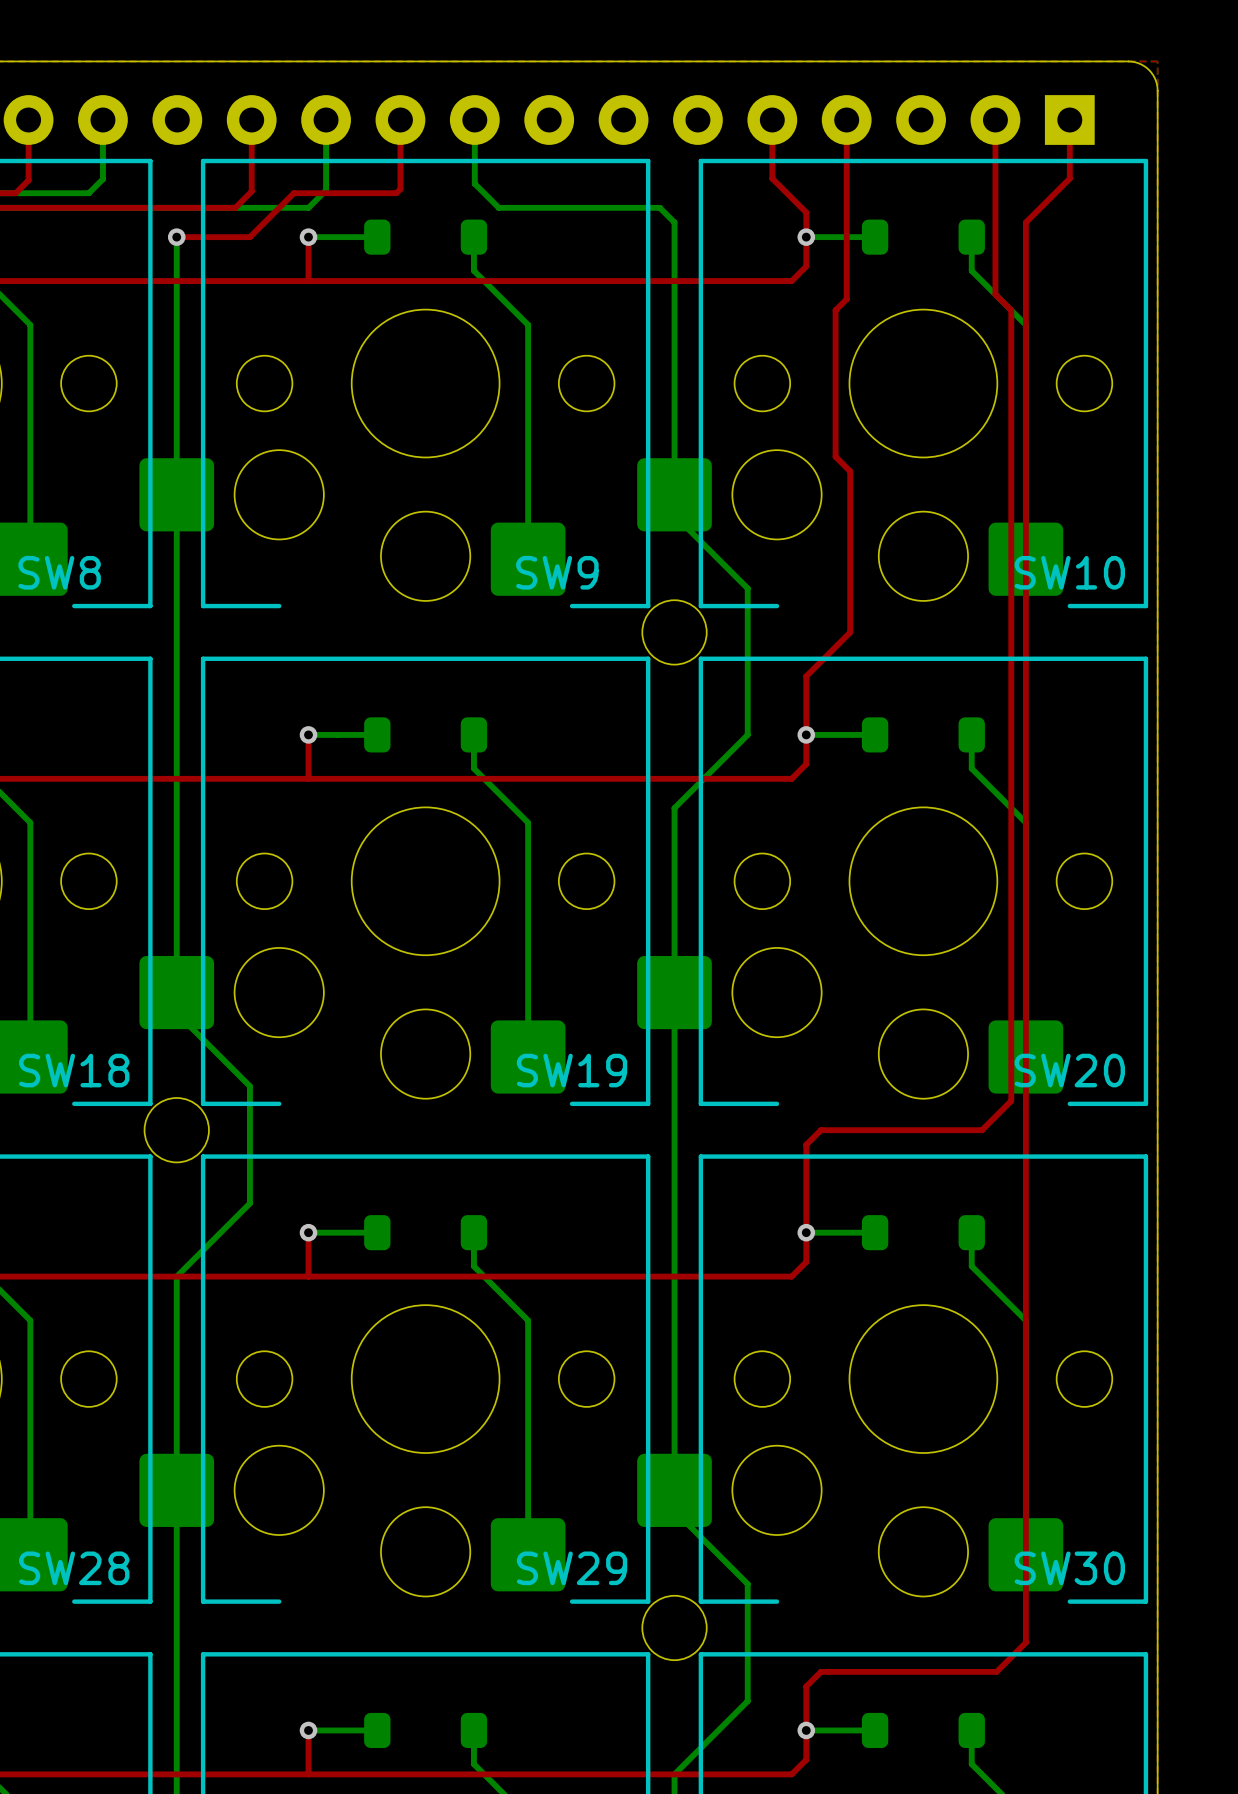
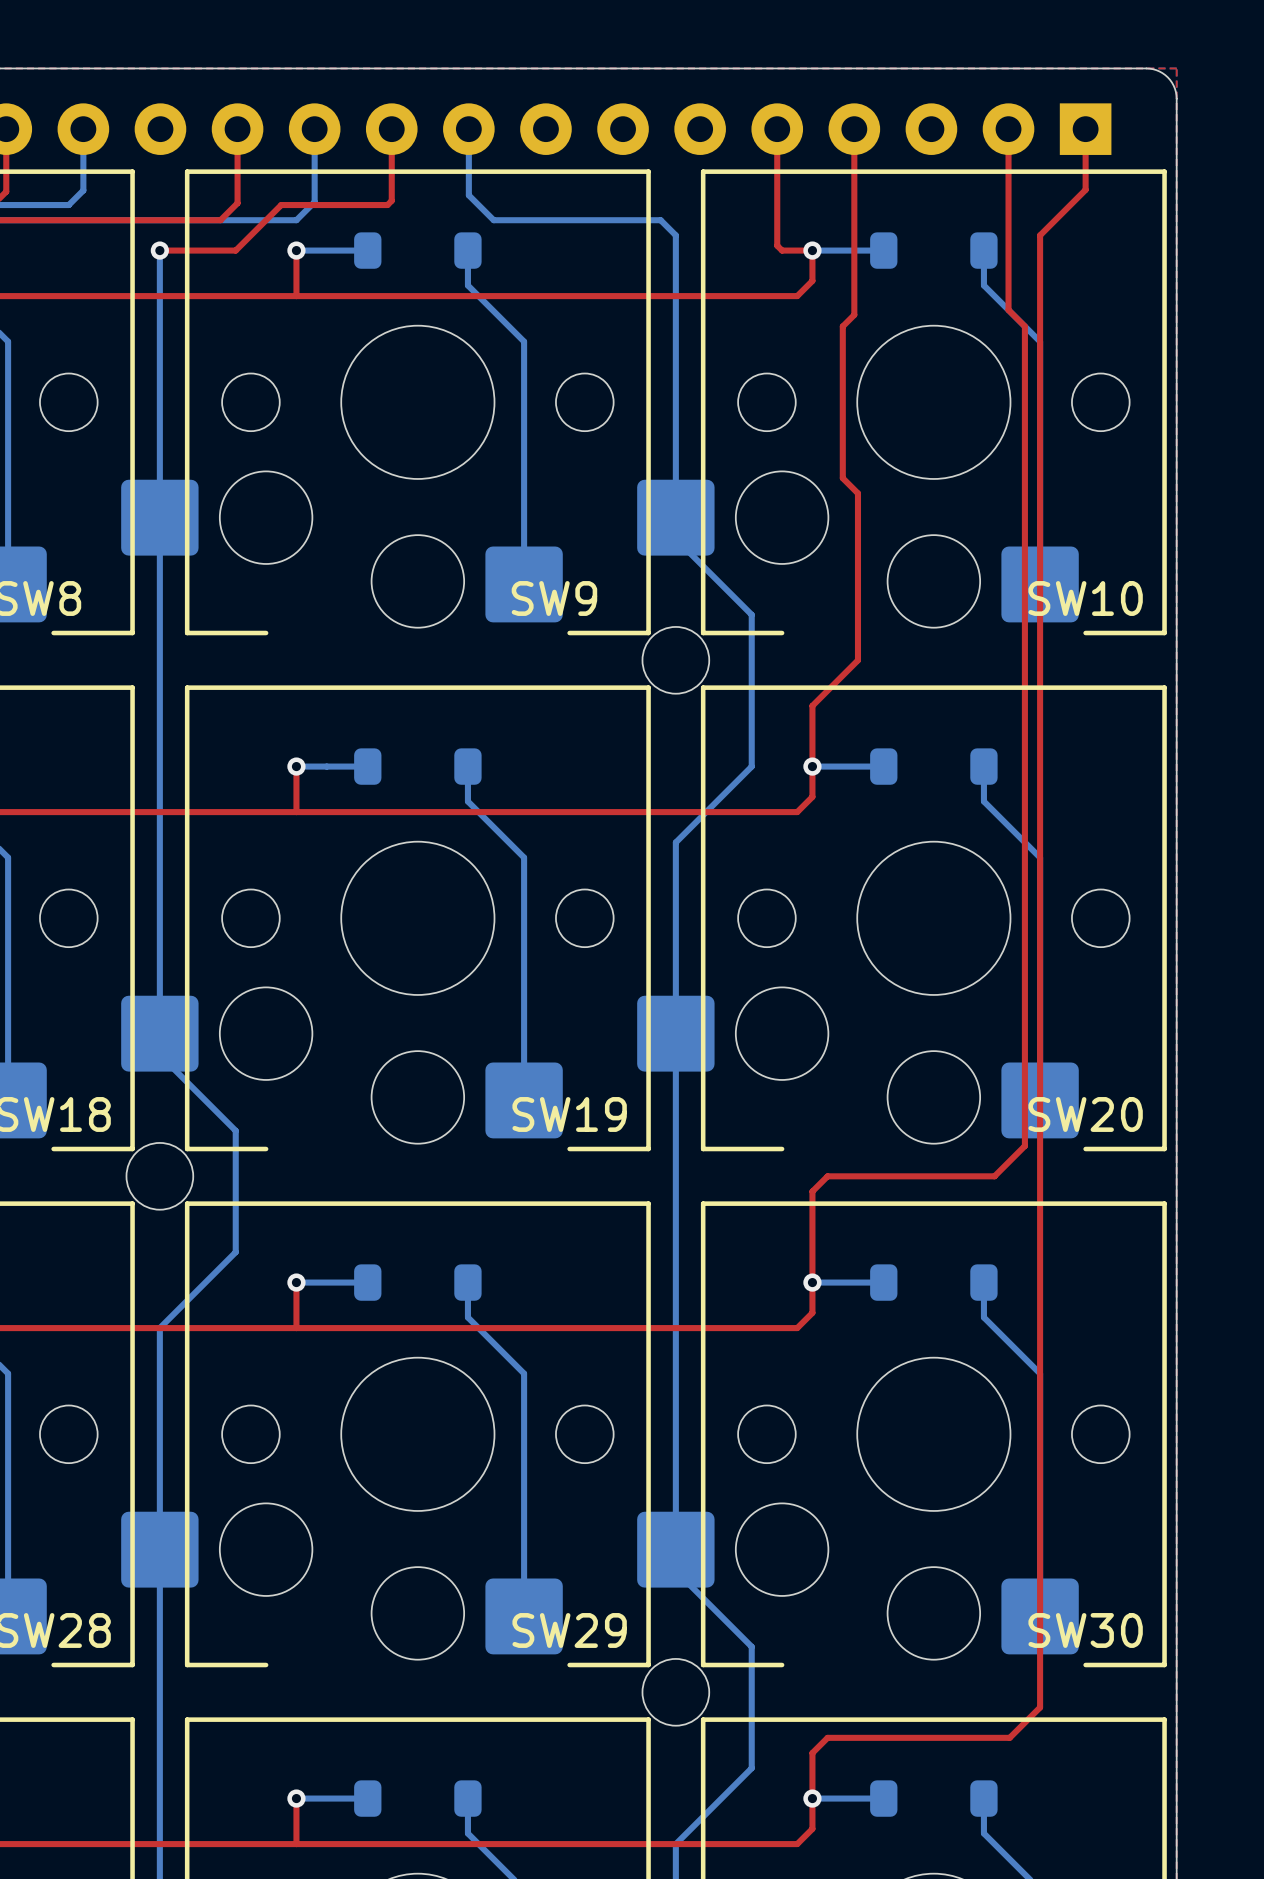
top track: (772, 178) (806, 212) (806, 237) -> (777, 189) (777, 245) (782, 250) (812, 250)

